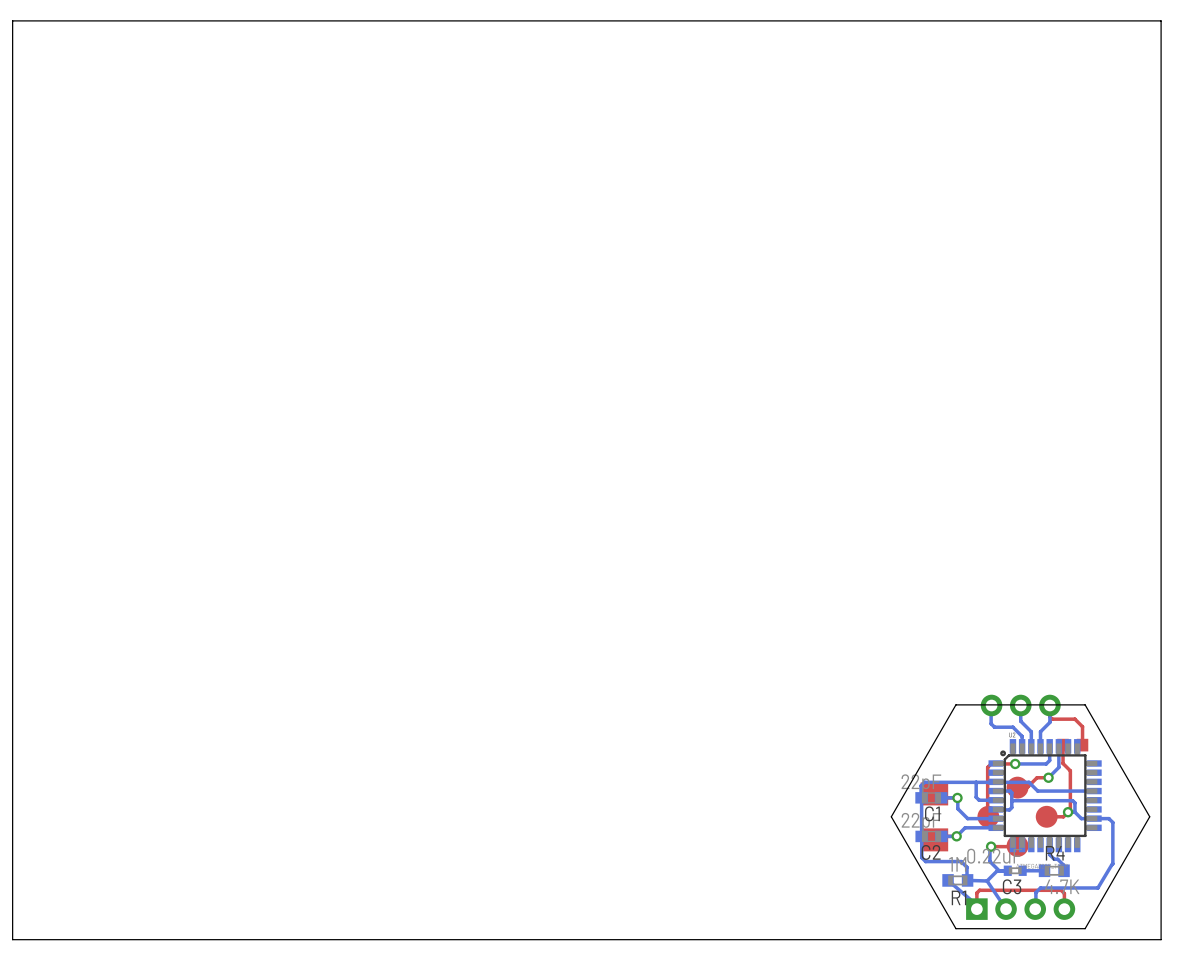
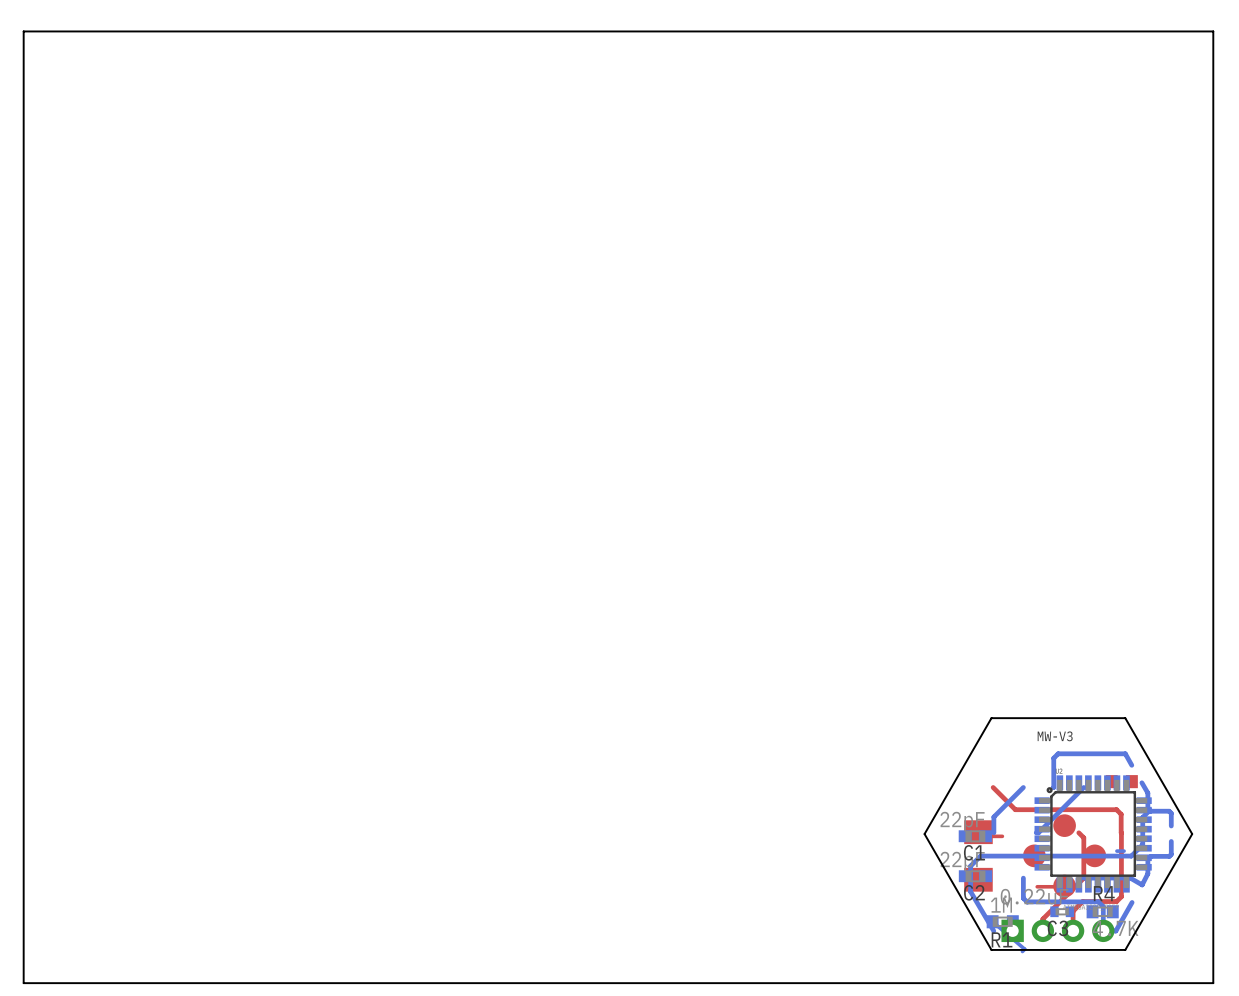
text: none -> MW-V3 (1055, 736)
board edge: (1085, 704) (1149, 816) (1085, 928) (955, 928) (891, 816) (955, 704) (1085, 704) -> (1125, 718) (1192, 834) (1125, 949) (991, 949) (924, 834) (991, 718) (1125, 718)
bottom track: (991, 705) (991, 723) (994, 727) (1012, 727) (1022, 736) (1022, 746) -> none
bottom track: (1020, 705) (1020, 721) (1031, 731) (1031, 746) -> none
part: (1020, 705) -> none
bottom track: (1049, 705) (1049, 722) (1040, 731) (1040, 746) -> none
top track: (1049, 705) (1049, 716) (1052, 719) (1074, 719) (1082, 726) (1082, 745) -> none
bottom track: none -> (1131, 765) (1125, 753) (1058, 753) (1053, 758) (1053, 787)
top track: (1063, 745) (1063, 763) (1070, 770) (1070, 809) (1063, 816) (1046, 816) -> none
bottom track: (1049, 746) (1049, 760) (1046, 763) (1015, 763) -> none
bottom track: (1058, 746) (1058, 767) (1048, 777) -> none
bottom track: none -> (1141, 782) (1147, 793) (1147, 808) (1150, 811) (1169, 811) (1171, 813) (1171, 825)
top track: none -> (993, 787) (1015, 809) (1116, 809) (1121, 814) (1121, 896) (1116, 901) (1082, 901) (1073, 911) (1073, 930)
bottom track: none -> (1023, 787) (993, 816) (993, 832)
bottom track: none -> (1083, 787) (1038, 832) (1036, 832)
top track: (1015, 763) (991, 763) (987, 767) (988, 816) -> none
via: (1015, 763) -> none
bottom track: none -> (1149, 810) (1142, 817) (1142, 844) (1131, 856) (980, 856) (970, 866) (970, 891) (993, 931)
top track: (1048, 777) (1037, 777) (1027, 786) (1017, 787) -> none
via: (1048, 777) -> none
bottom track: (976, 782) (976, 797) (979, 800) (995, 800) -> none
bottom track: (995, 791) (1011, 792) (1011, 807) (1009, 809) (995, 809) -> none
bottom track: (1094, 791) (1037, 791) (1029, 782) (924, 782) (921, 785) (921, 836) -> none
top track: none -> (1078, 832) (1083, 837) (1083, 878) (1042, 919) (1042, 930)
bottom track: (941, 797) (957, 797) (957, 808) (967, 818) (995, 818) -> none
via: (957, 797) -> none
bottom track: (1011, 800) (1072, 800) (1074, 803) (1074, 812) (1081, 818) (1108, 818) (1112, 822) (1112, 863) (1097, 887) (1040, 887) (1035, 892) (1035, 909) -> none
bottom track: none -> (1171, 841) (1171, 854) (1169, 856) (1150, 856) (1147, 859) (1147, 873) (1142, 884) (1130, 877) (1083, 878)
via: (1068, 812) -> none
bottom track: (995, 827) (965, 827) (956, 836) (941, 836) -> none
bottom track: (921, 836) (921, 857) (925, 861) (961, 861) (967, 867) (967, 880) (987, 880) -> none
via: (956, 836) -> none
bottom track: none -> (1023, 878) (1023, 898) (1027, 902)
bottom track: (1049, 844) (1049, 854) (1063, 865) (1064, 870) -> none
bottom track: (991, 846) (989, 861) (999, 870) -> none
via: (991, 846) -> none
bottom track: none -> (1027, 901) (1098, 901) (1103, 906) (1103, 930) (1115, 931) (1132, 902)
bottom track: (1007, 870) (997, 870) (987, 880) -> none
bottom track: (1044, 870) (1022, 870) -> none
bottom track: (987, 880) (1006, 909) -> none
part position: (1020, 909) -> (1057, 930)
top track: (1064, 909) (1064, 893) (1061, 890) (979, 890) (976, 893) (976, 909) -> none

